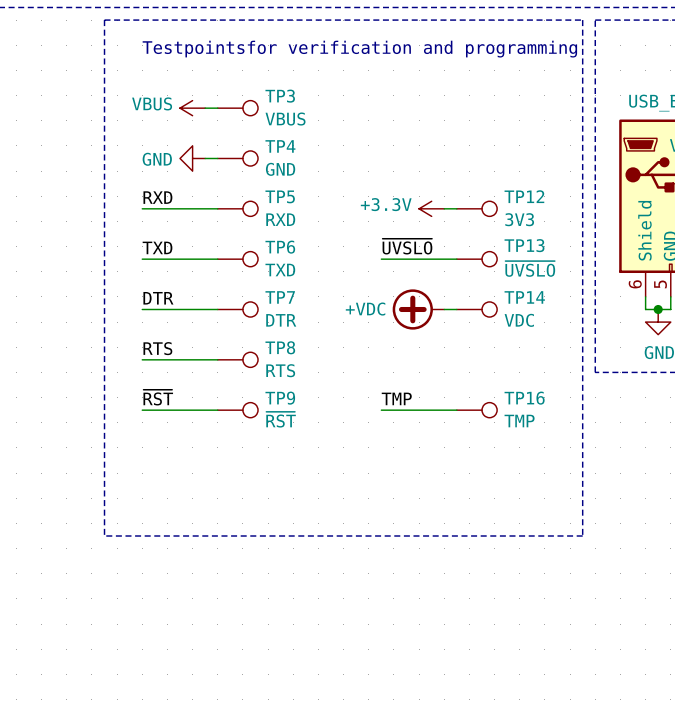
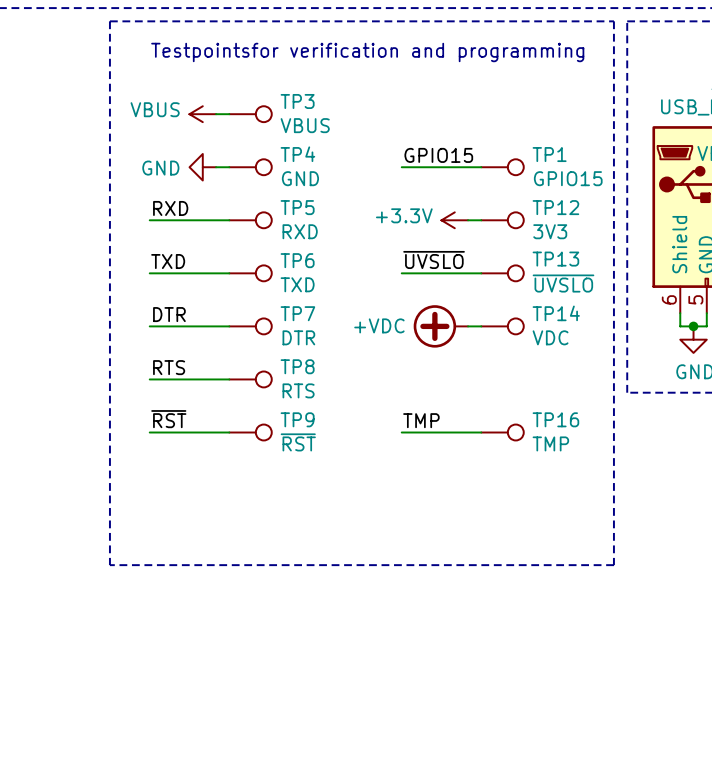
label: none -> GPIO15 (438, 155)
wire: none -> (401, 167) (481, 167)
TP1: none -> GPIO15 (502, 167)

